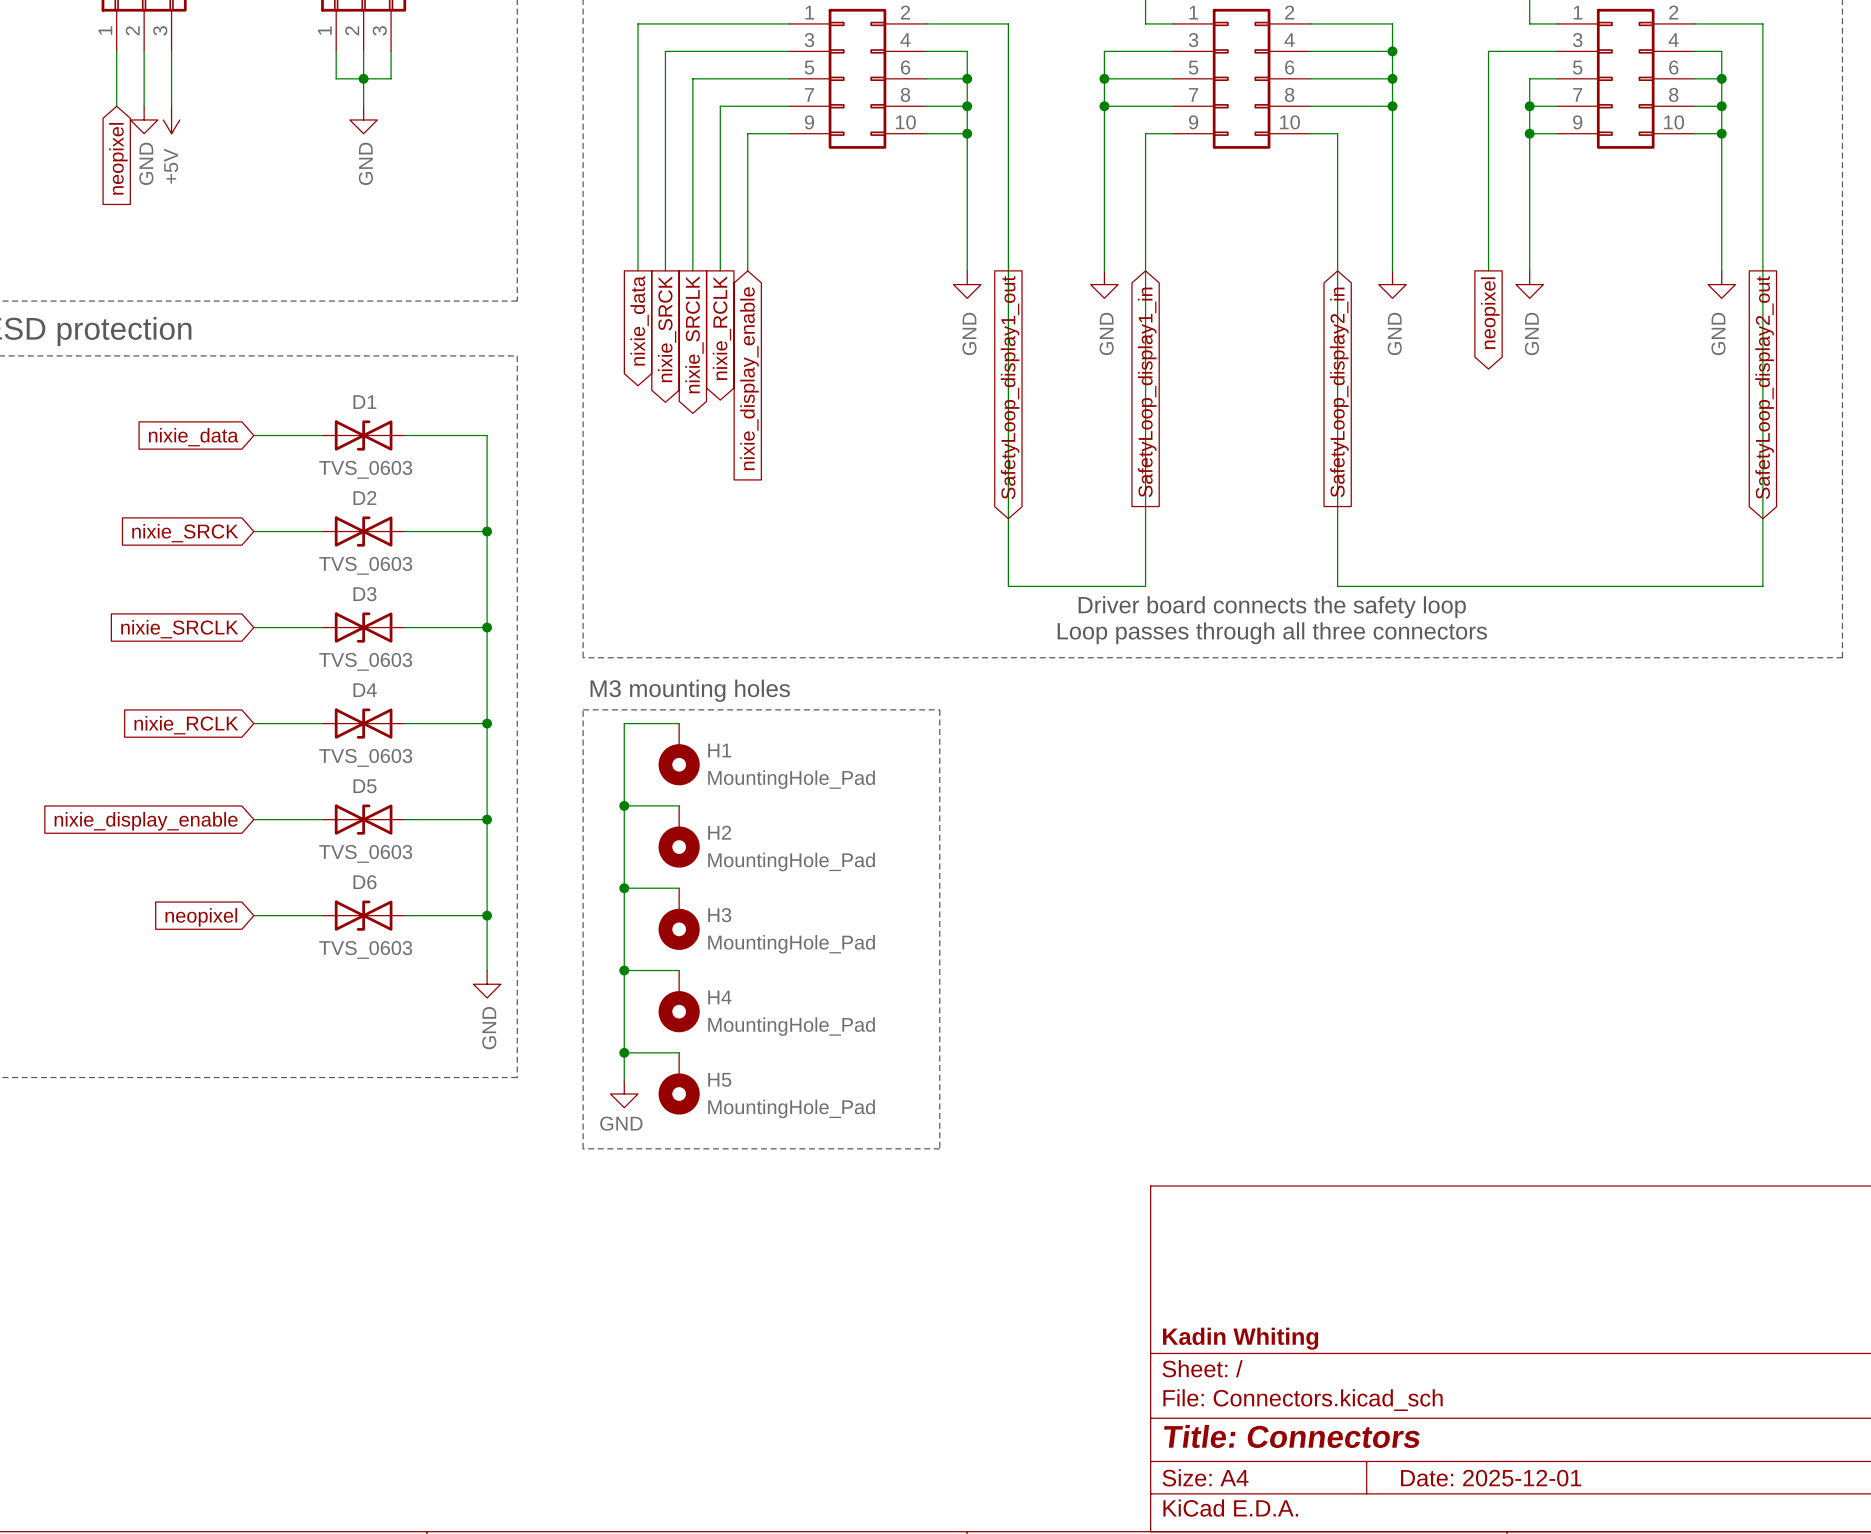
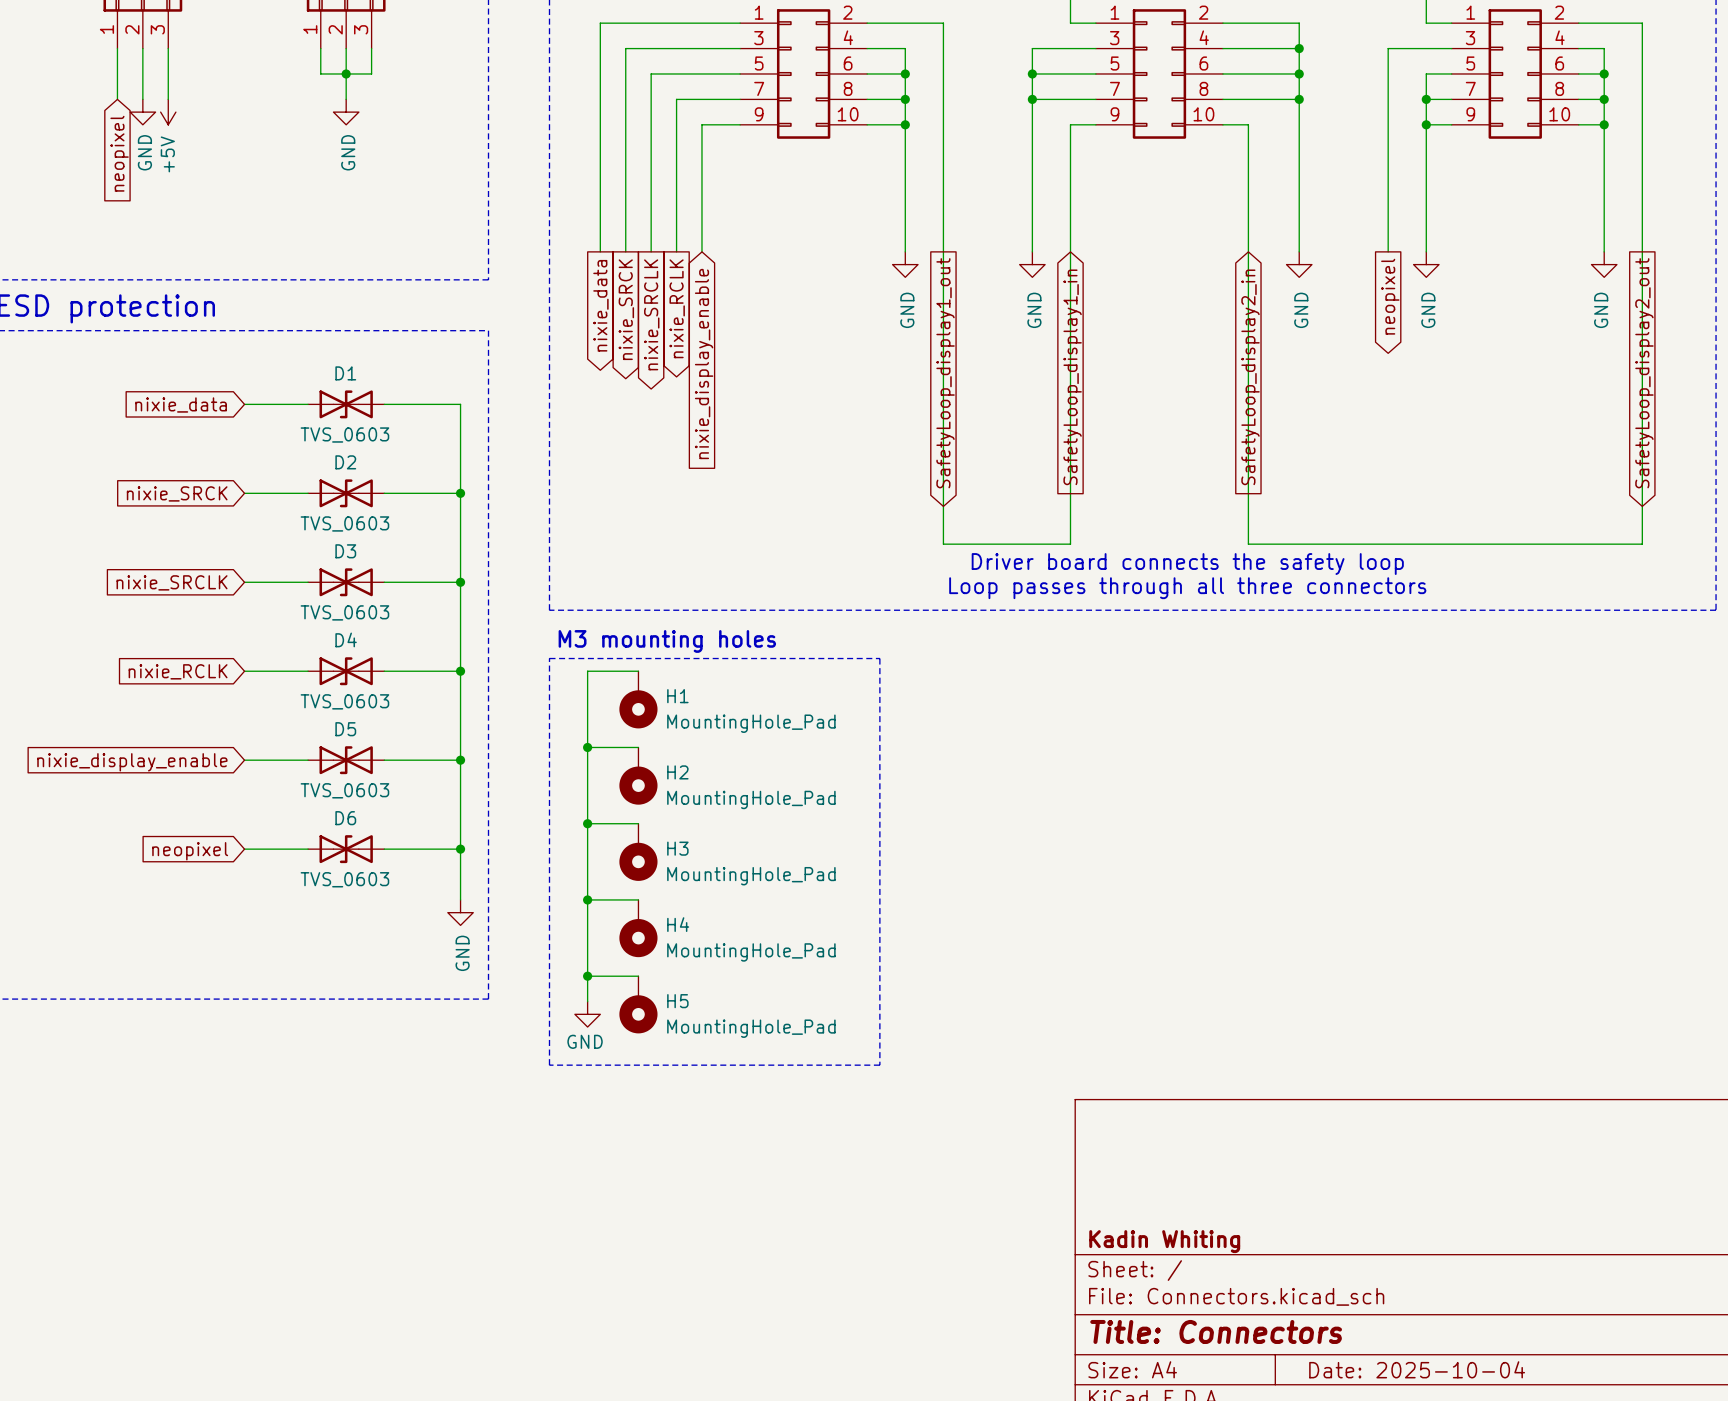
title block: Date: 2025-12-01 (1491, 1478) -> Date: 2025-10-04 (1417, 1369)

